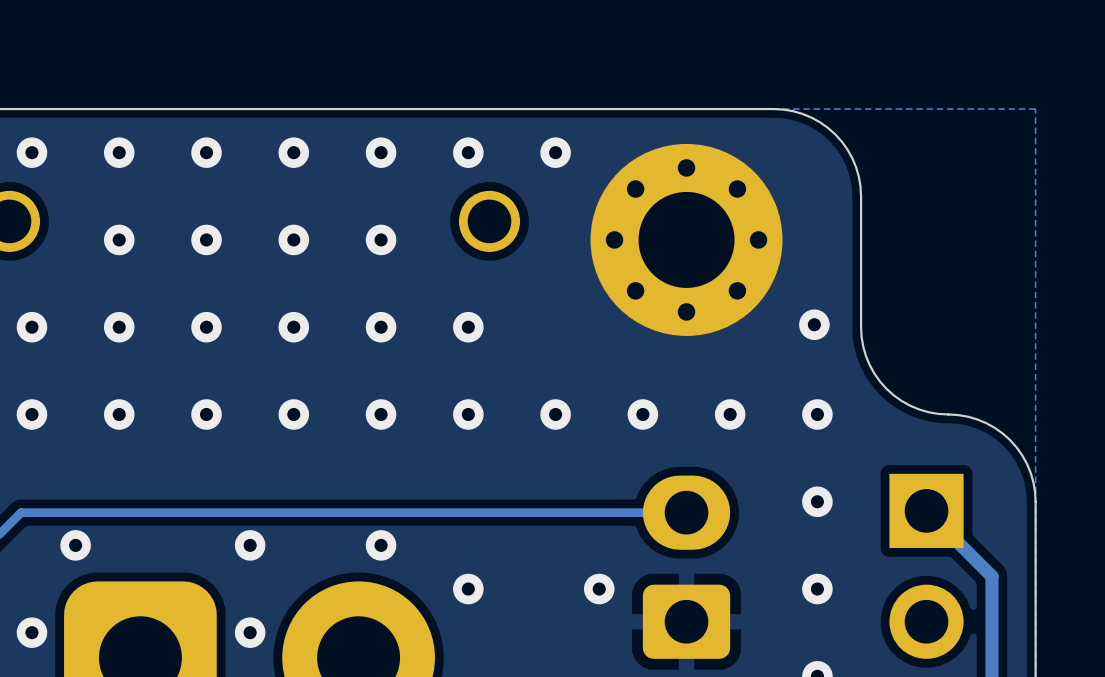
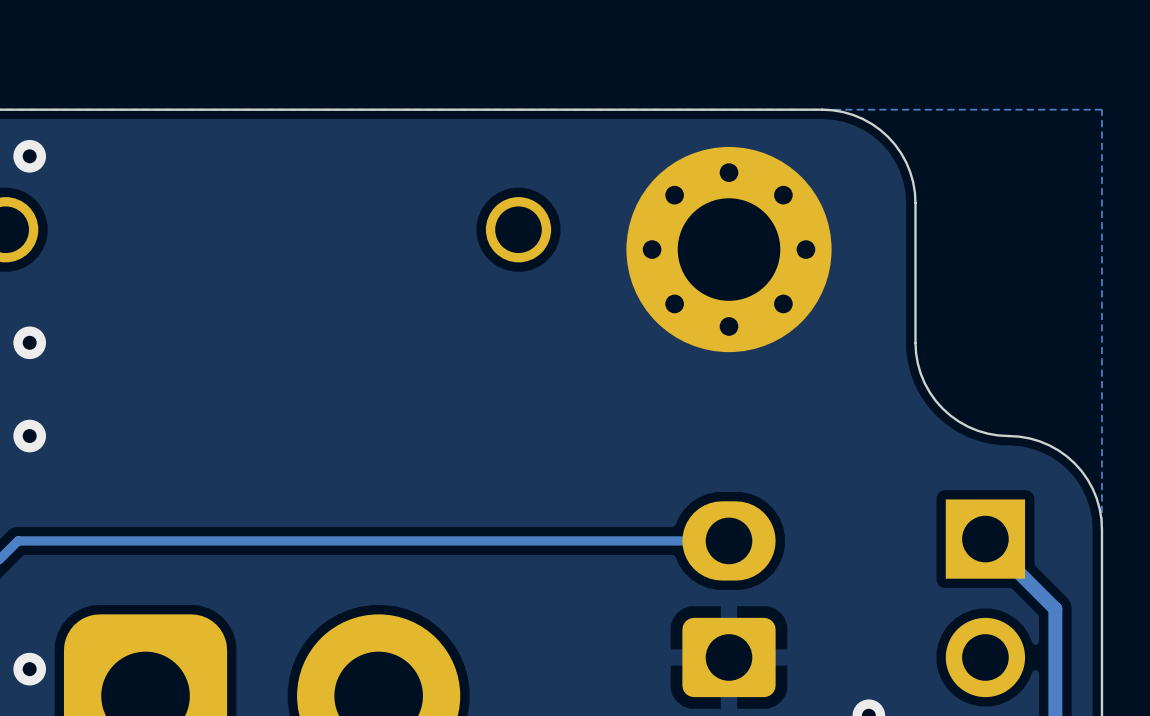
via: (119, 152) -> none
via: (206, 152) -> none
via: (293, 152) -> none
via: (381, 152) -> none
via: (468, 152) -> none
via: (555, 152) -> none
via: (119, 239) -> none
via: (206, 239) -> none
via: (293, 239) -> none
via: (381, 239) -> none
via: (814, 324) -> none
via: (119, 327) -> none
via: (206, 327) -> none
via: (293, 327) -> none
via: (381, 327) -> none
via: (468, 327) -> none
via: (119, 414) -> none
via: (206, 414) -> none
via: (293, 414) -> none
via: (381, 414) -> none
via: (468, 414) -> none
via: (555, 414) -> none
via: (642, 414) -> none
via: (730, 414) -> none
via: (817, 414) -> none
via: (817, 501) -> none
via: (75, 545) -> none
via: (250, 545) -> none
via: (381, 545) -> none
via: (468, 589) -> none
via: (599, 589) -> none
via: (817, 589) -> none
via: (250, 632) -> none

